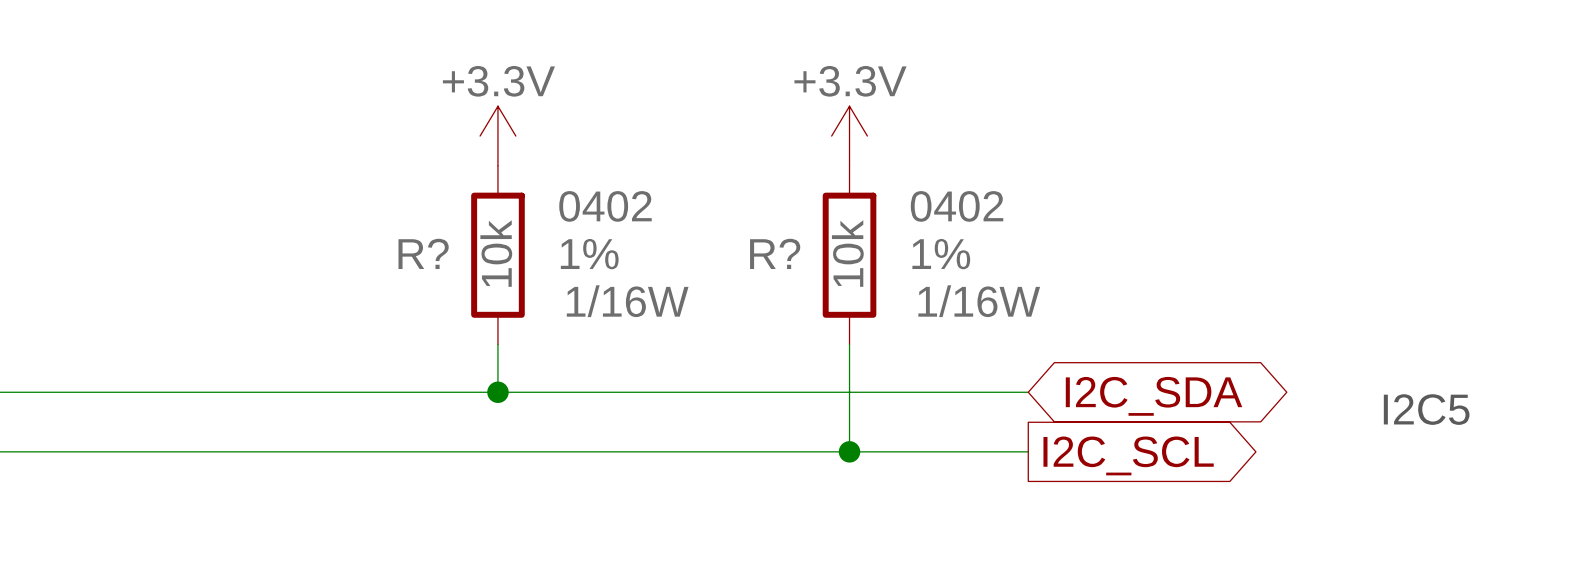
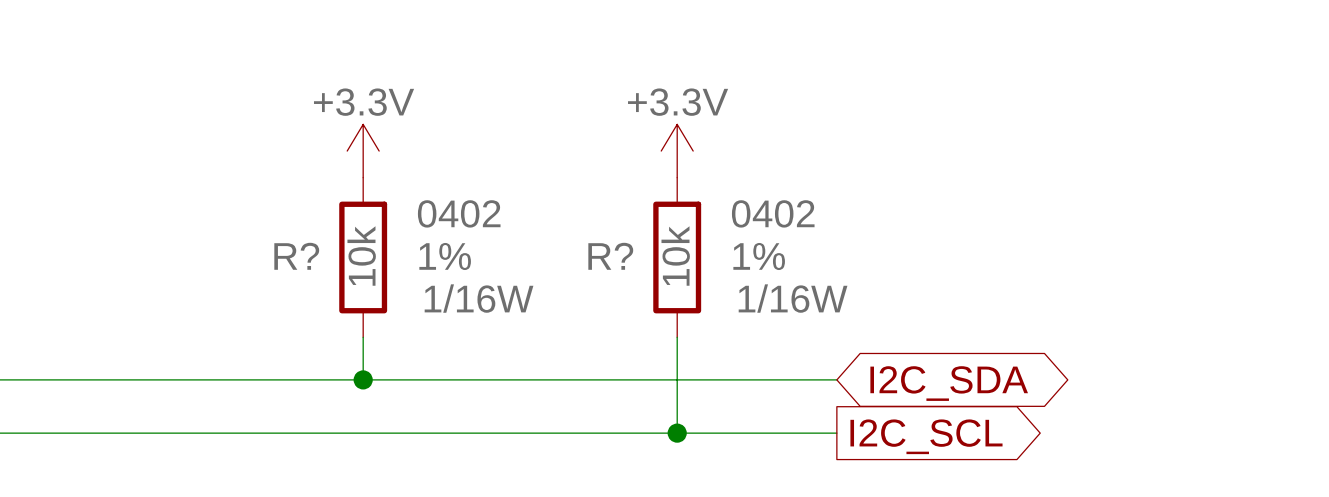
text: I2C5 (1426, 409) -> none

